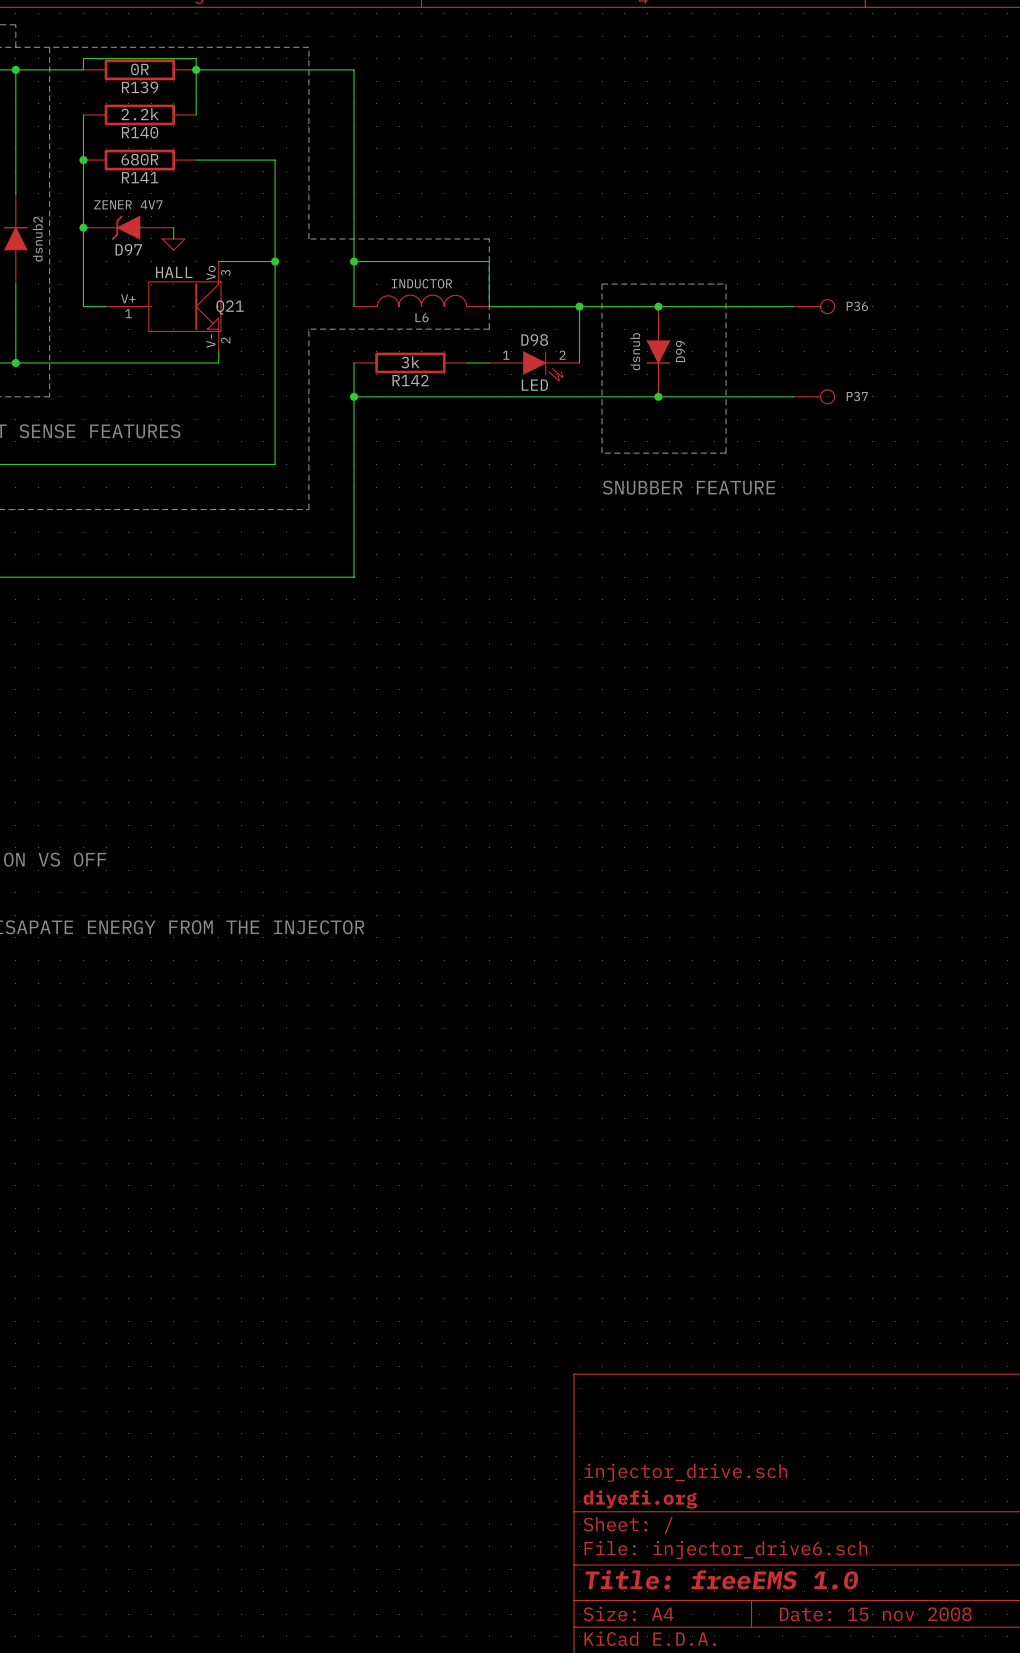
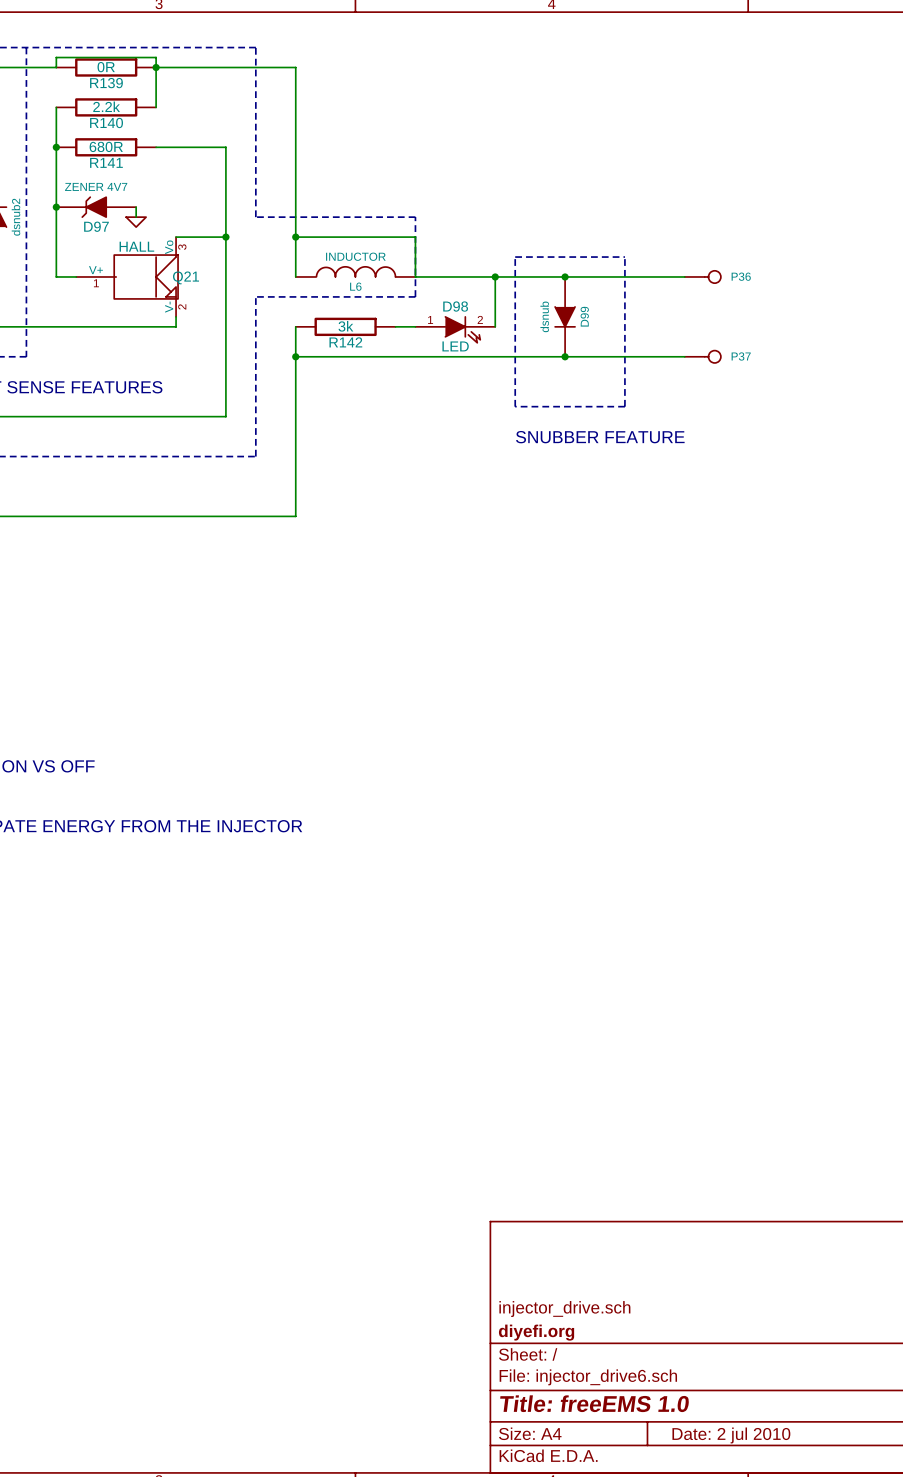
title block: Date: 15 nov 2008 (875, 1614) -> Date: 2 jul 2010 (731, 1435)

